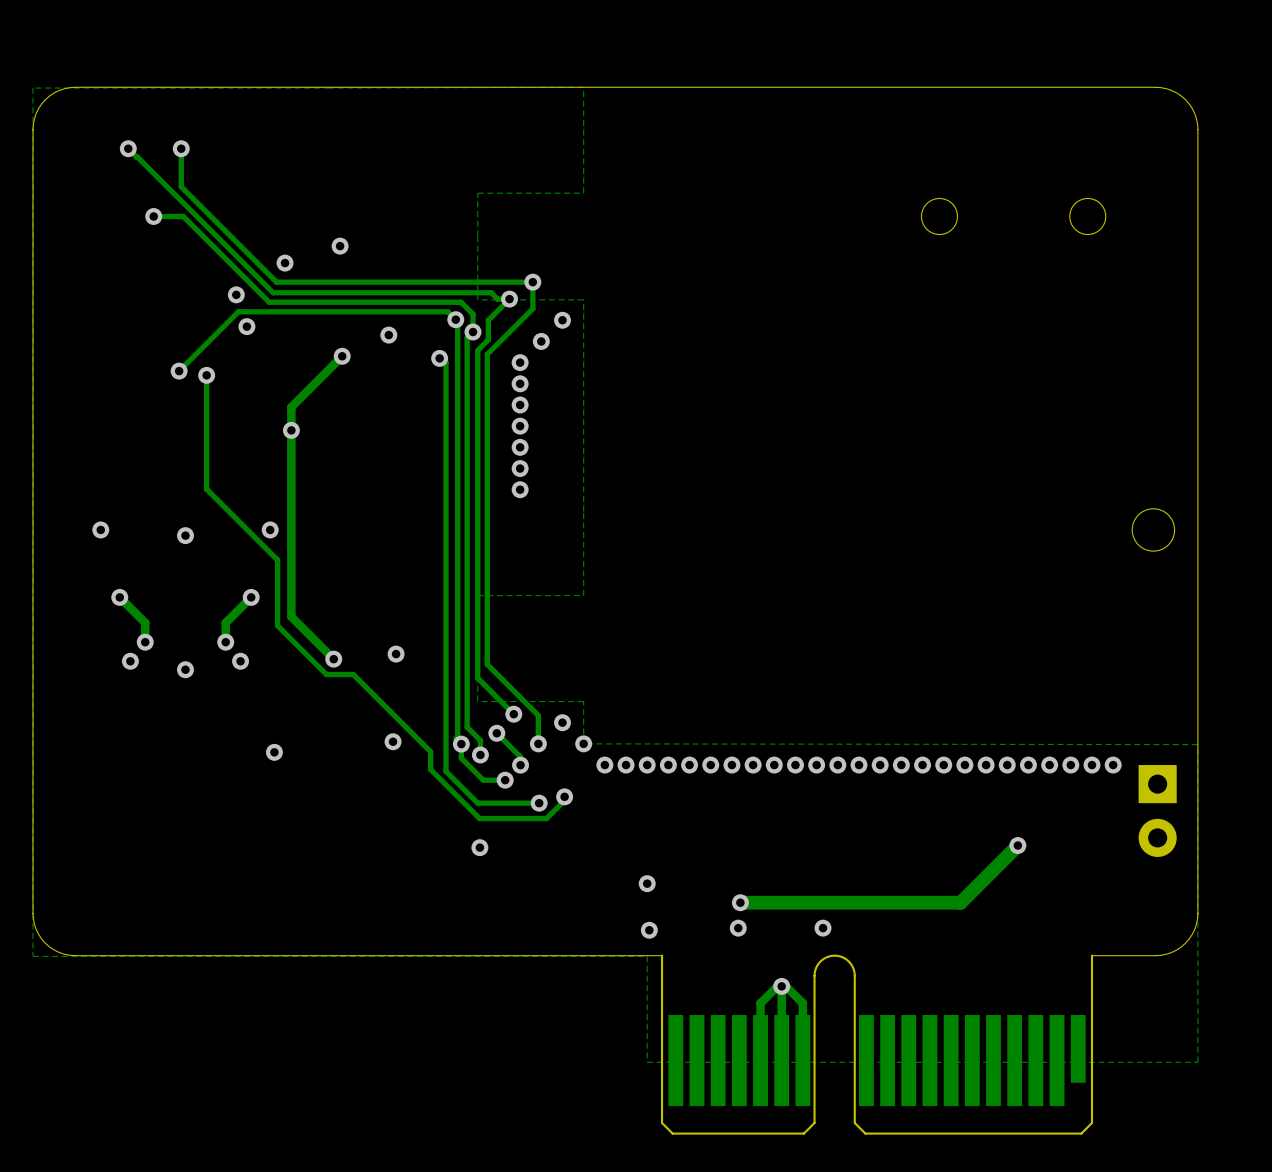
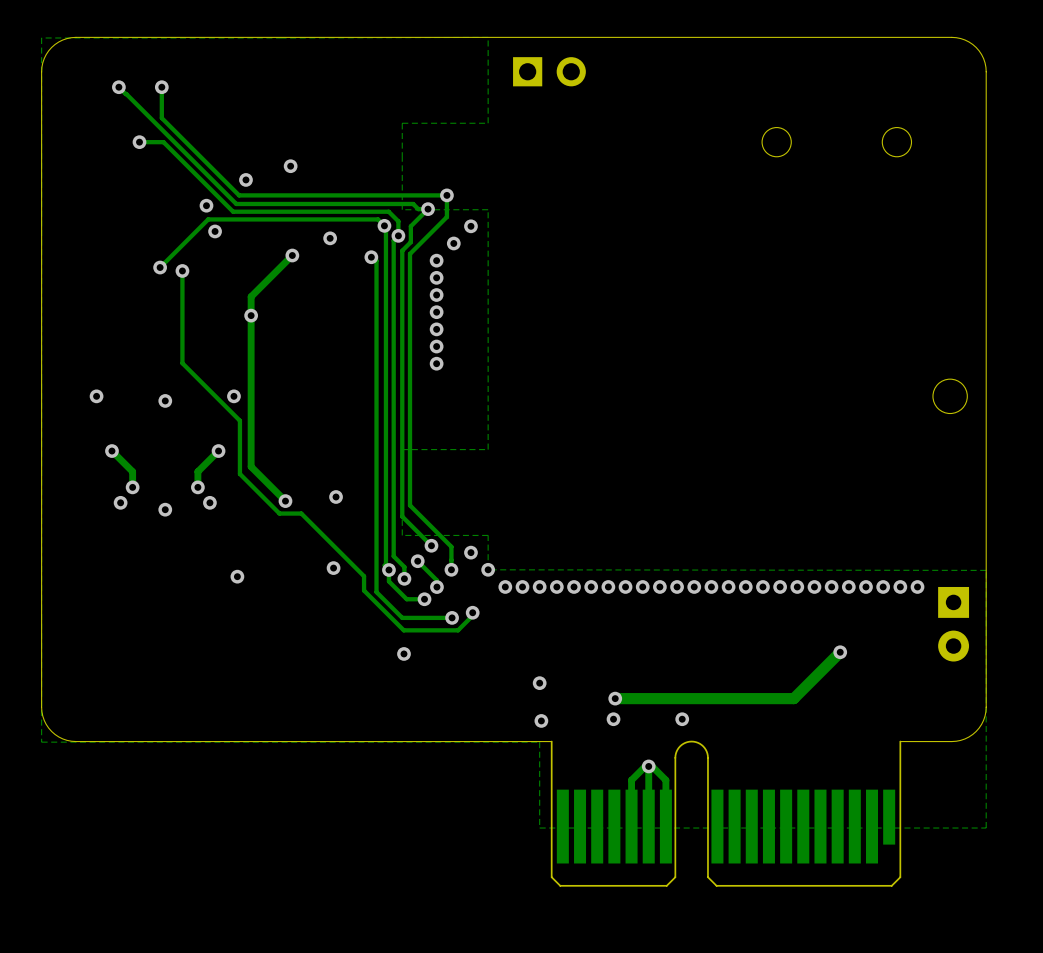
part: none -> (549, 71)

